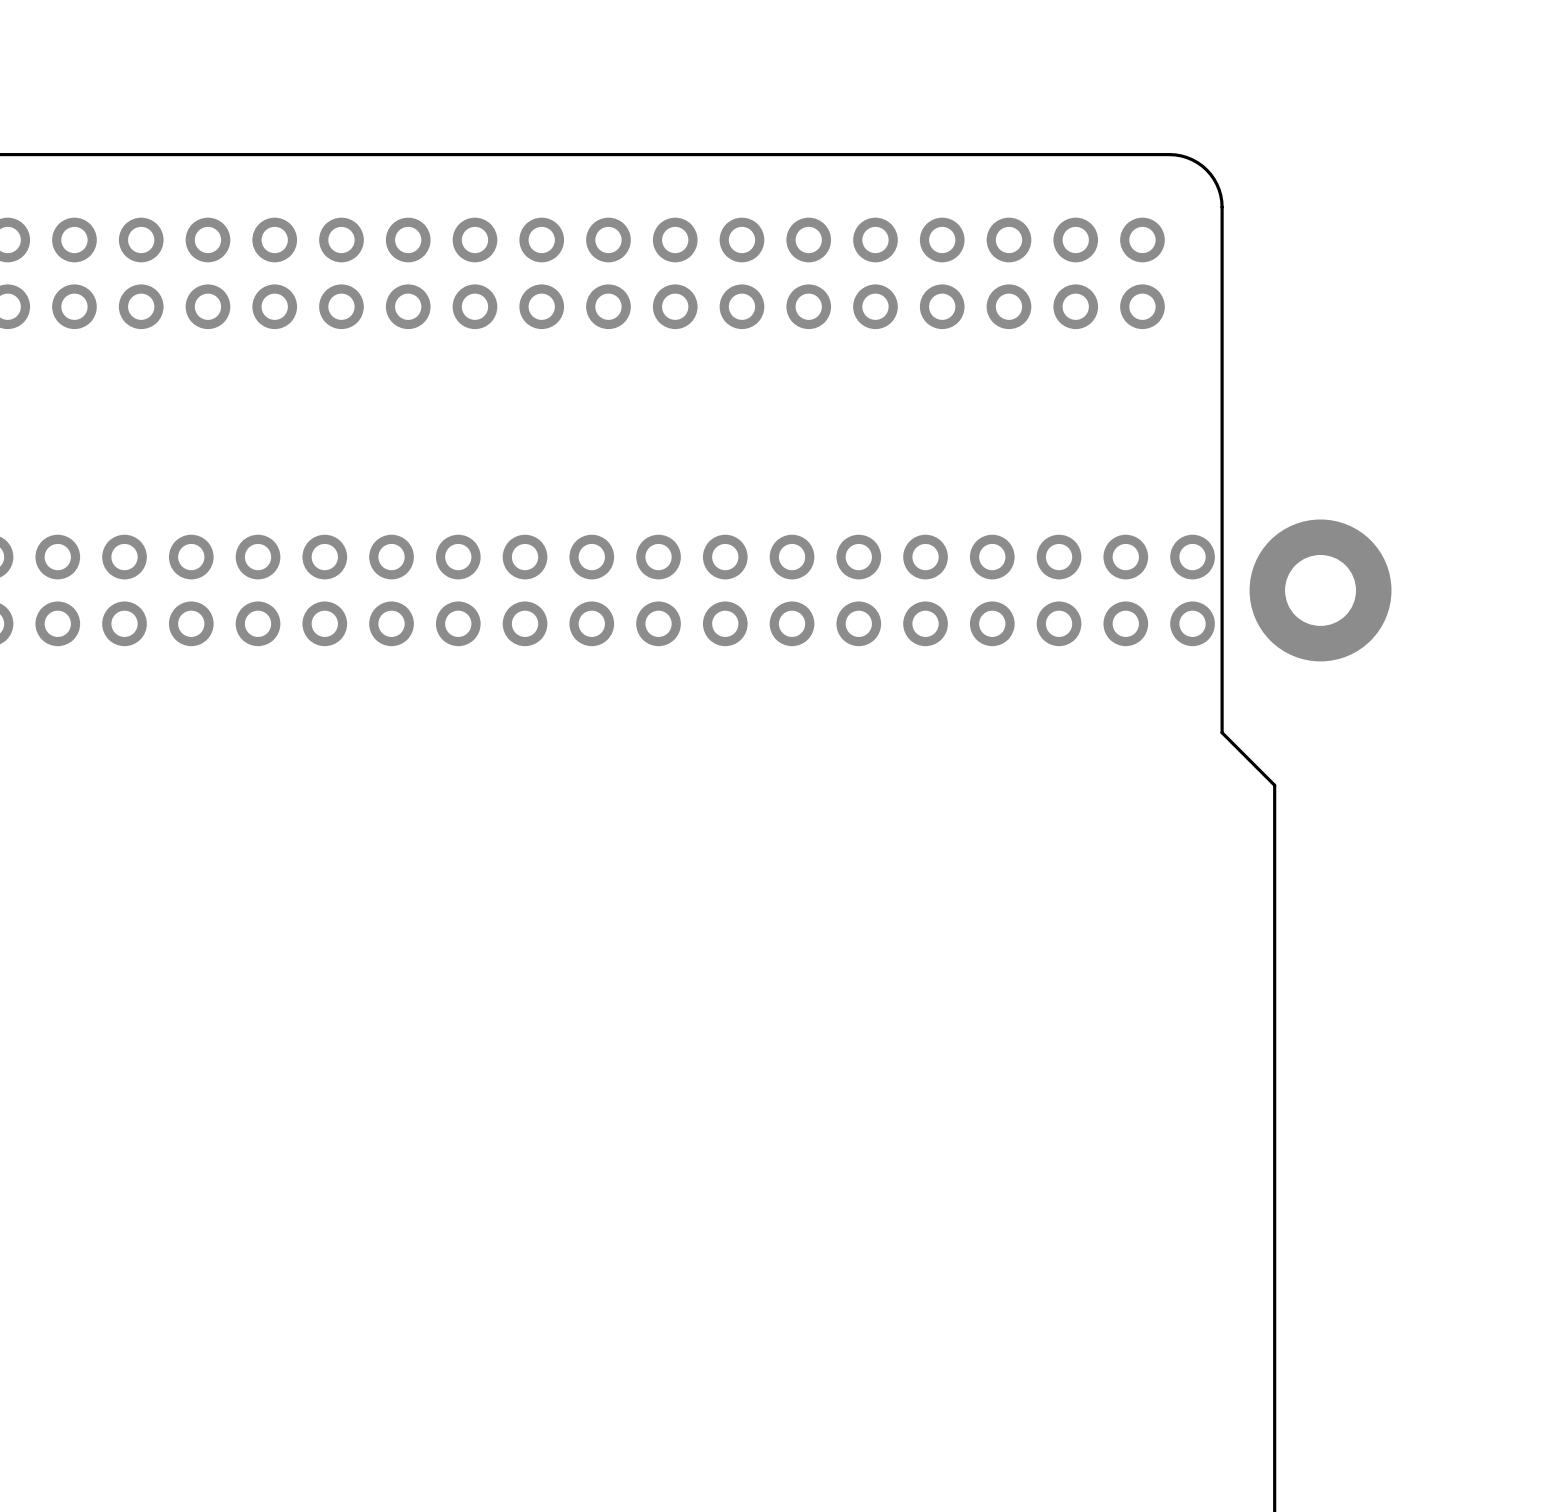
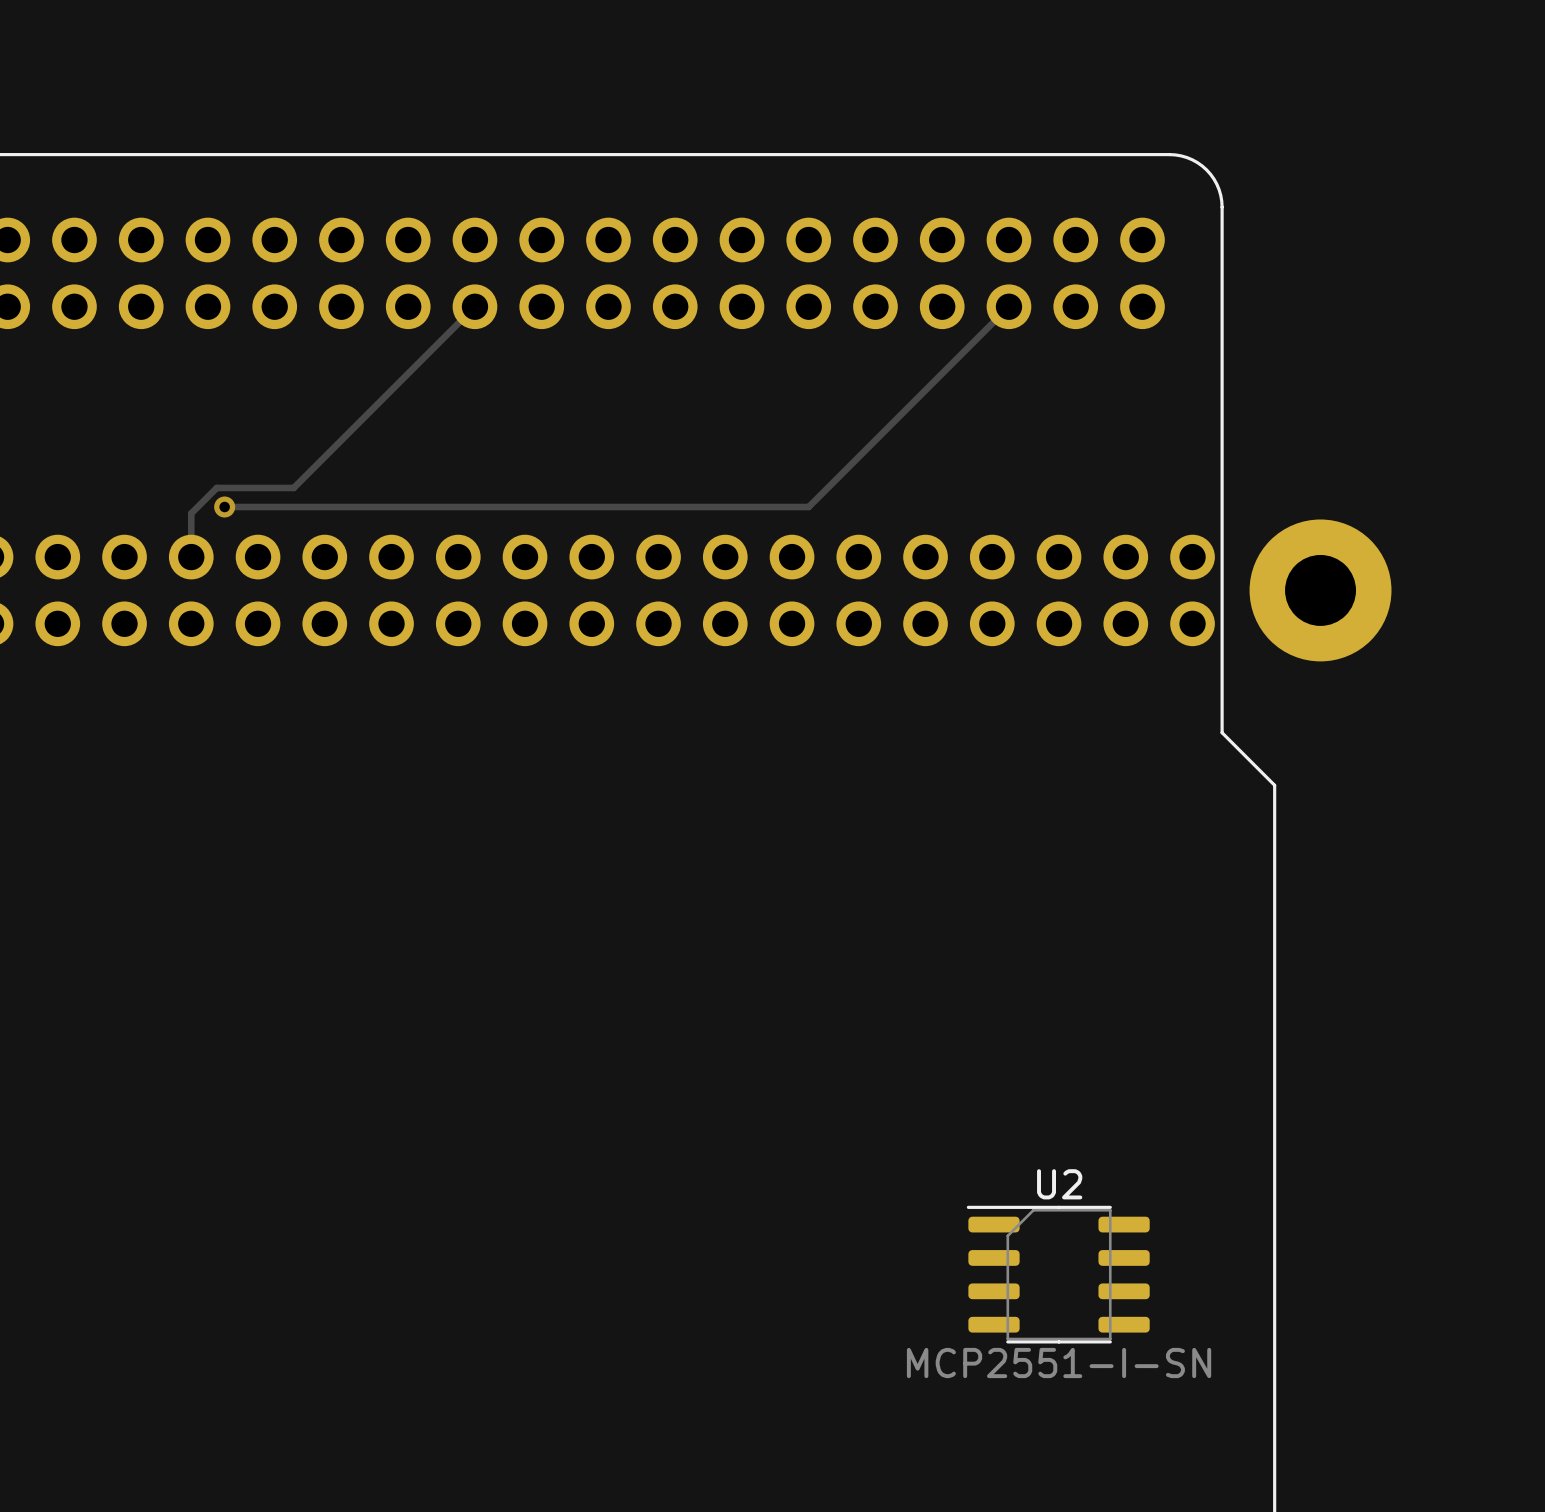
track: none -> (474, 306) (293, 487) (216, 487) (191, 513) (191, 557)
track: none -> (1008, 306) (808, 507) (224, 507)
via: none -> (224, 507)
U2: none -> MCP2551-I-SN (1058, 1274)

